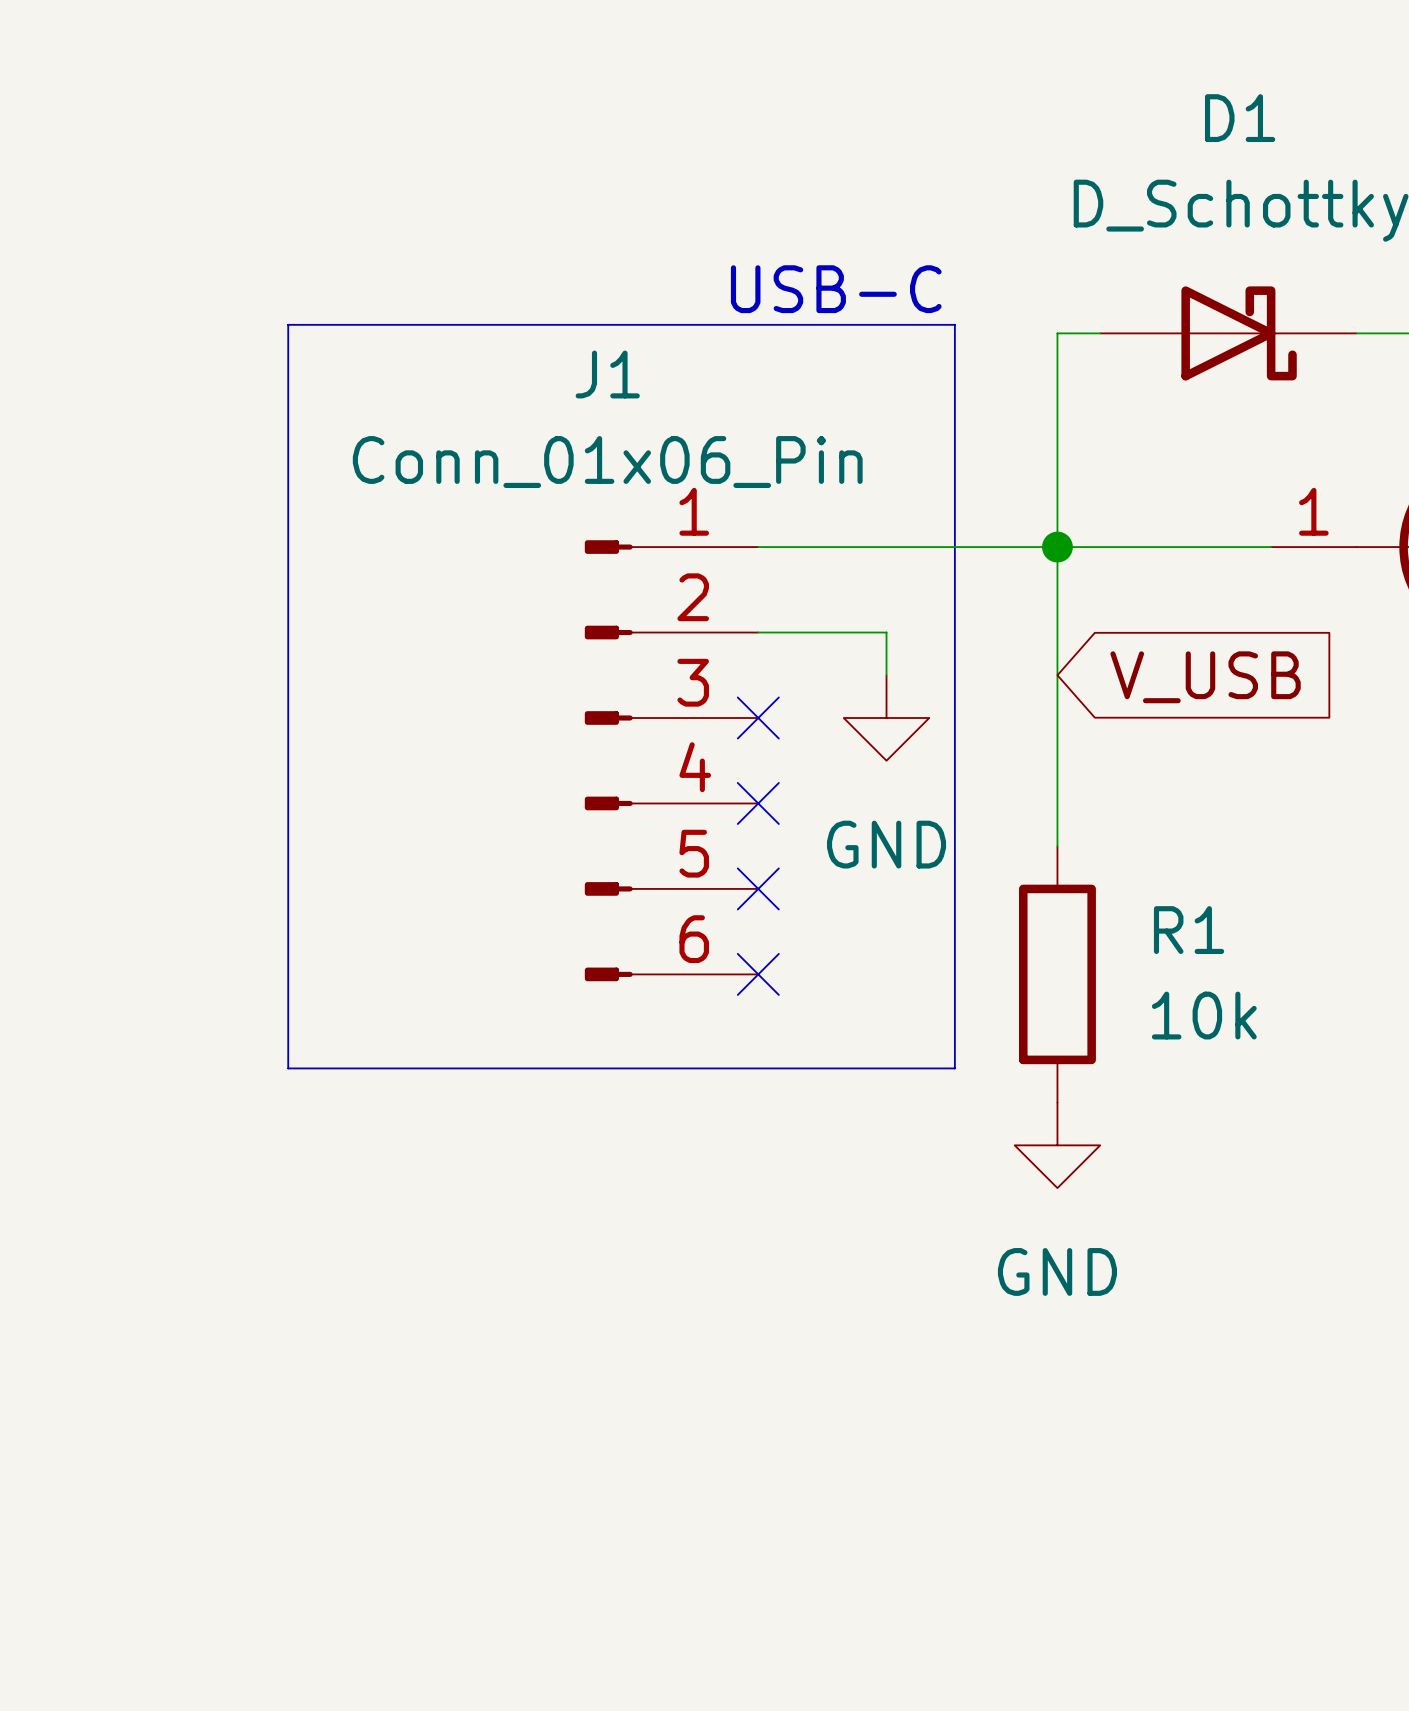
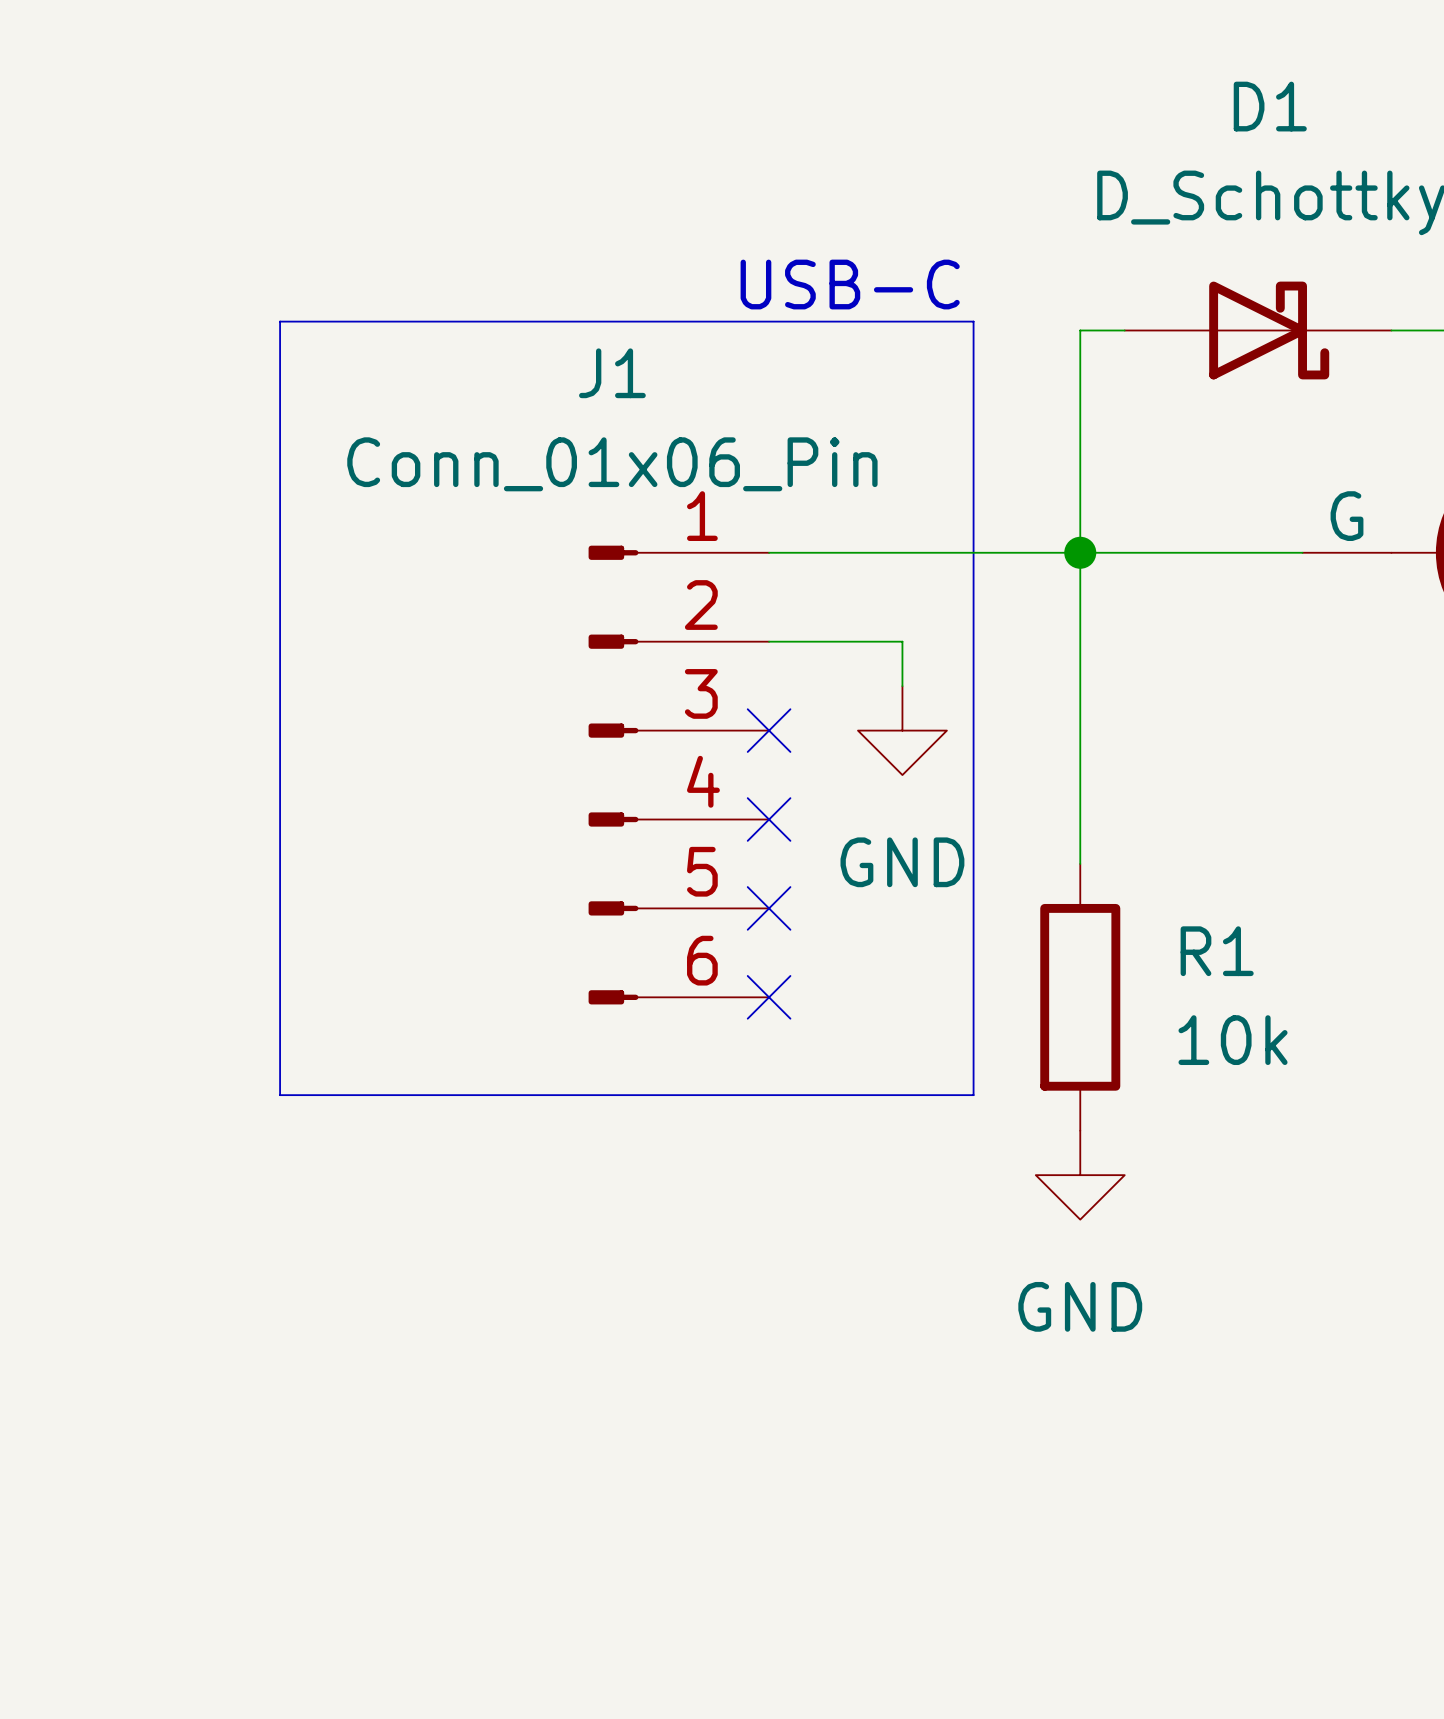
part pin name: none -> G (1347, 516)
part pin number: 1 (1313, 511) -> none
global label: V_USB (1205, 677) -> none

